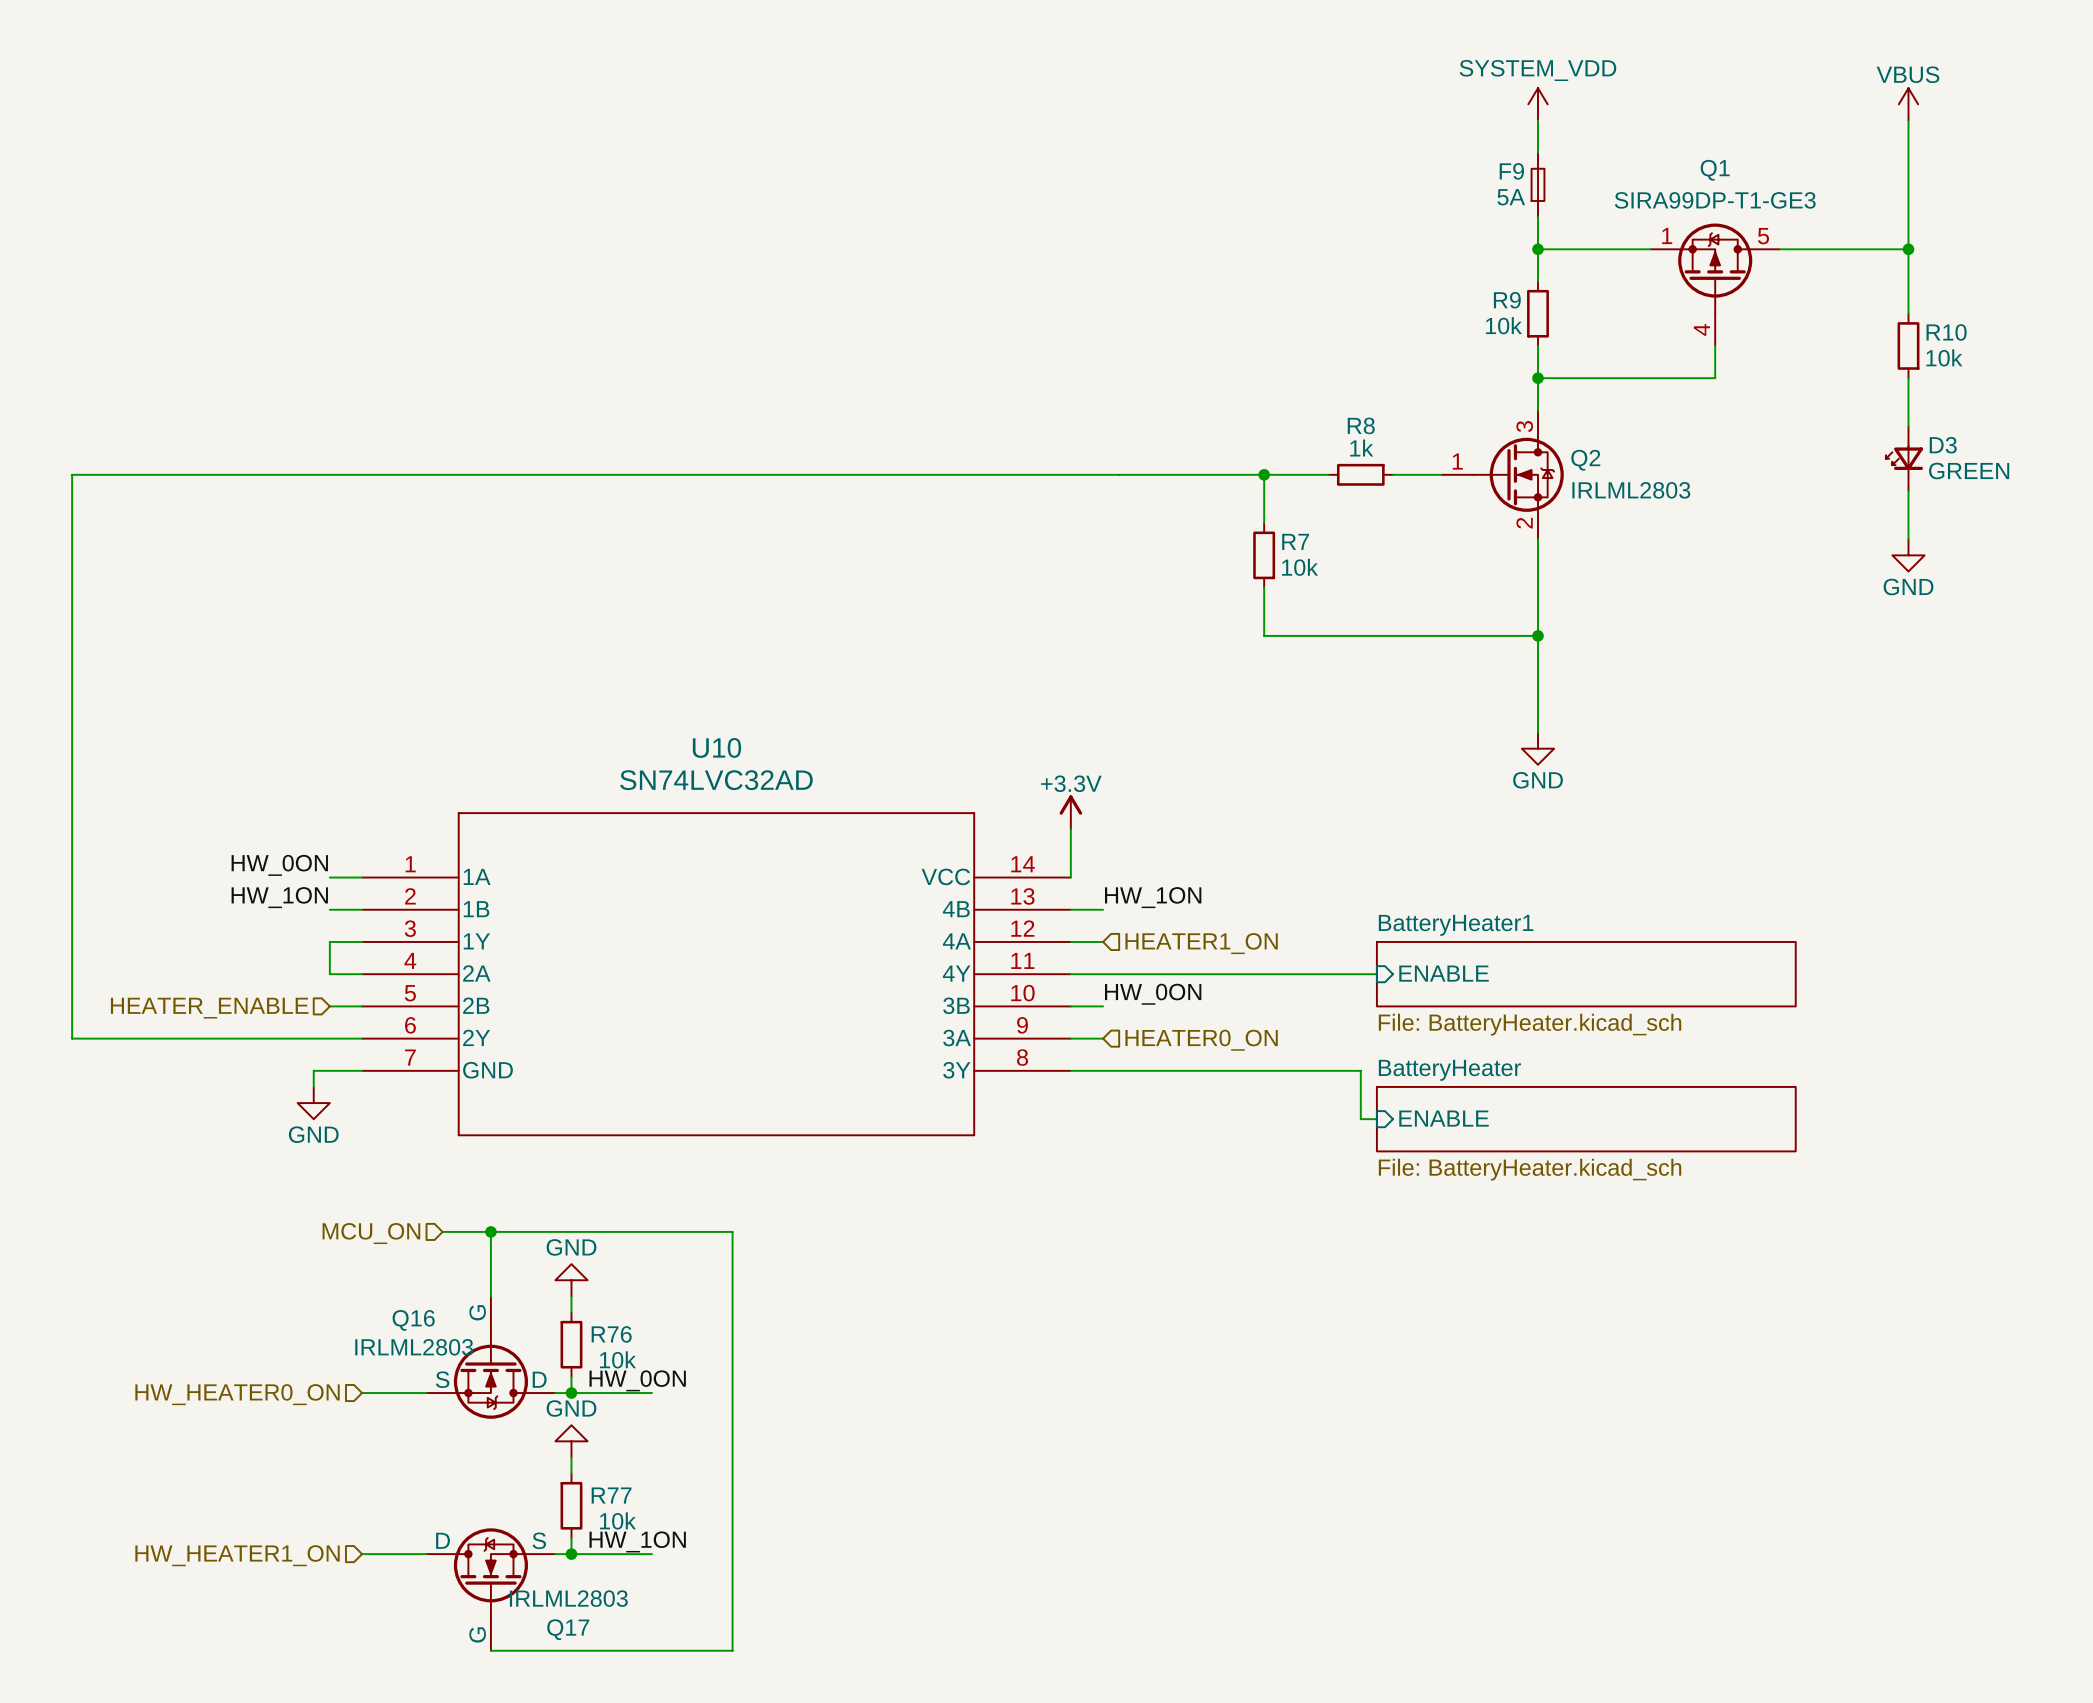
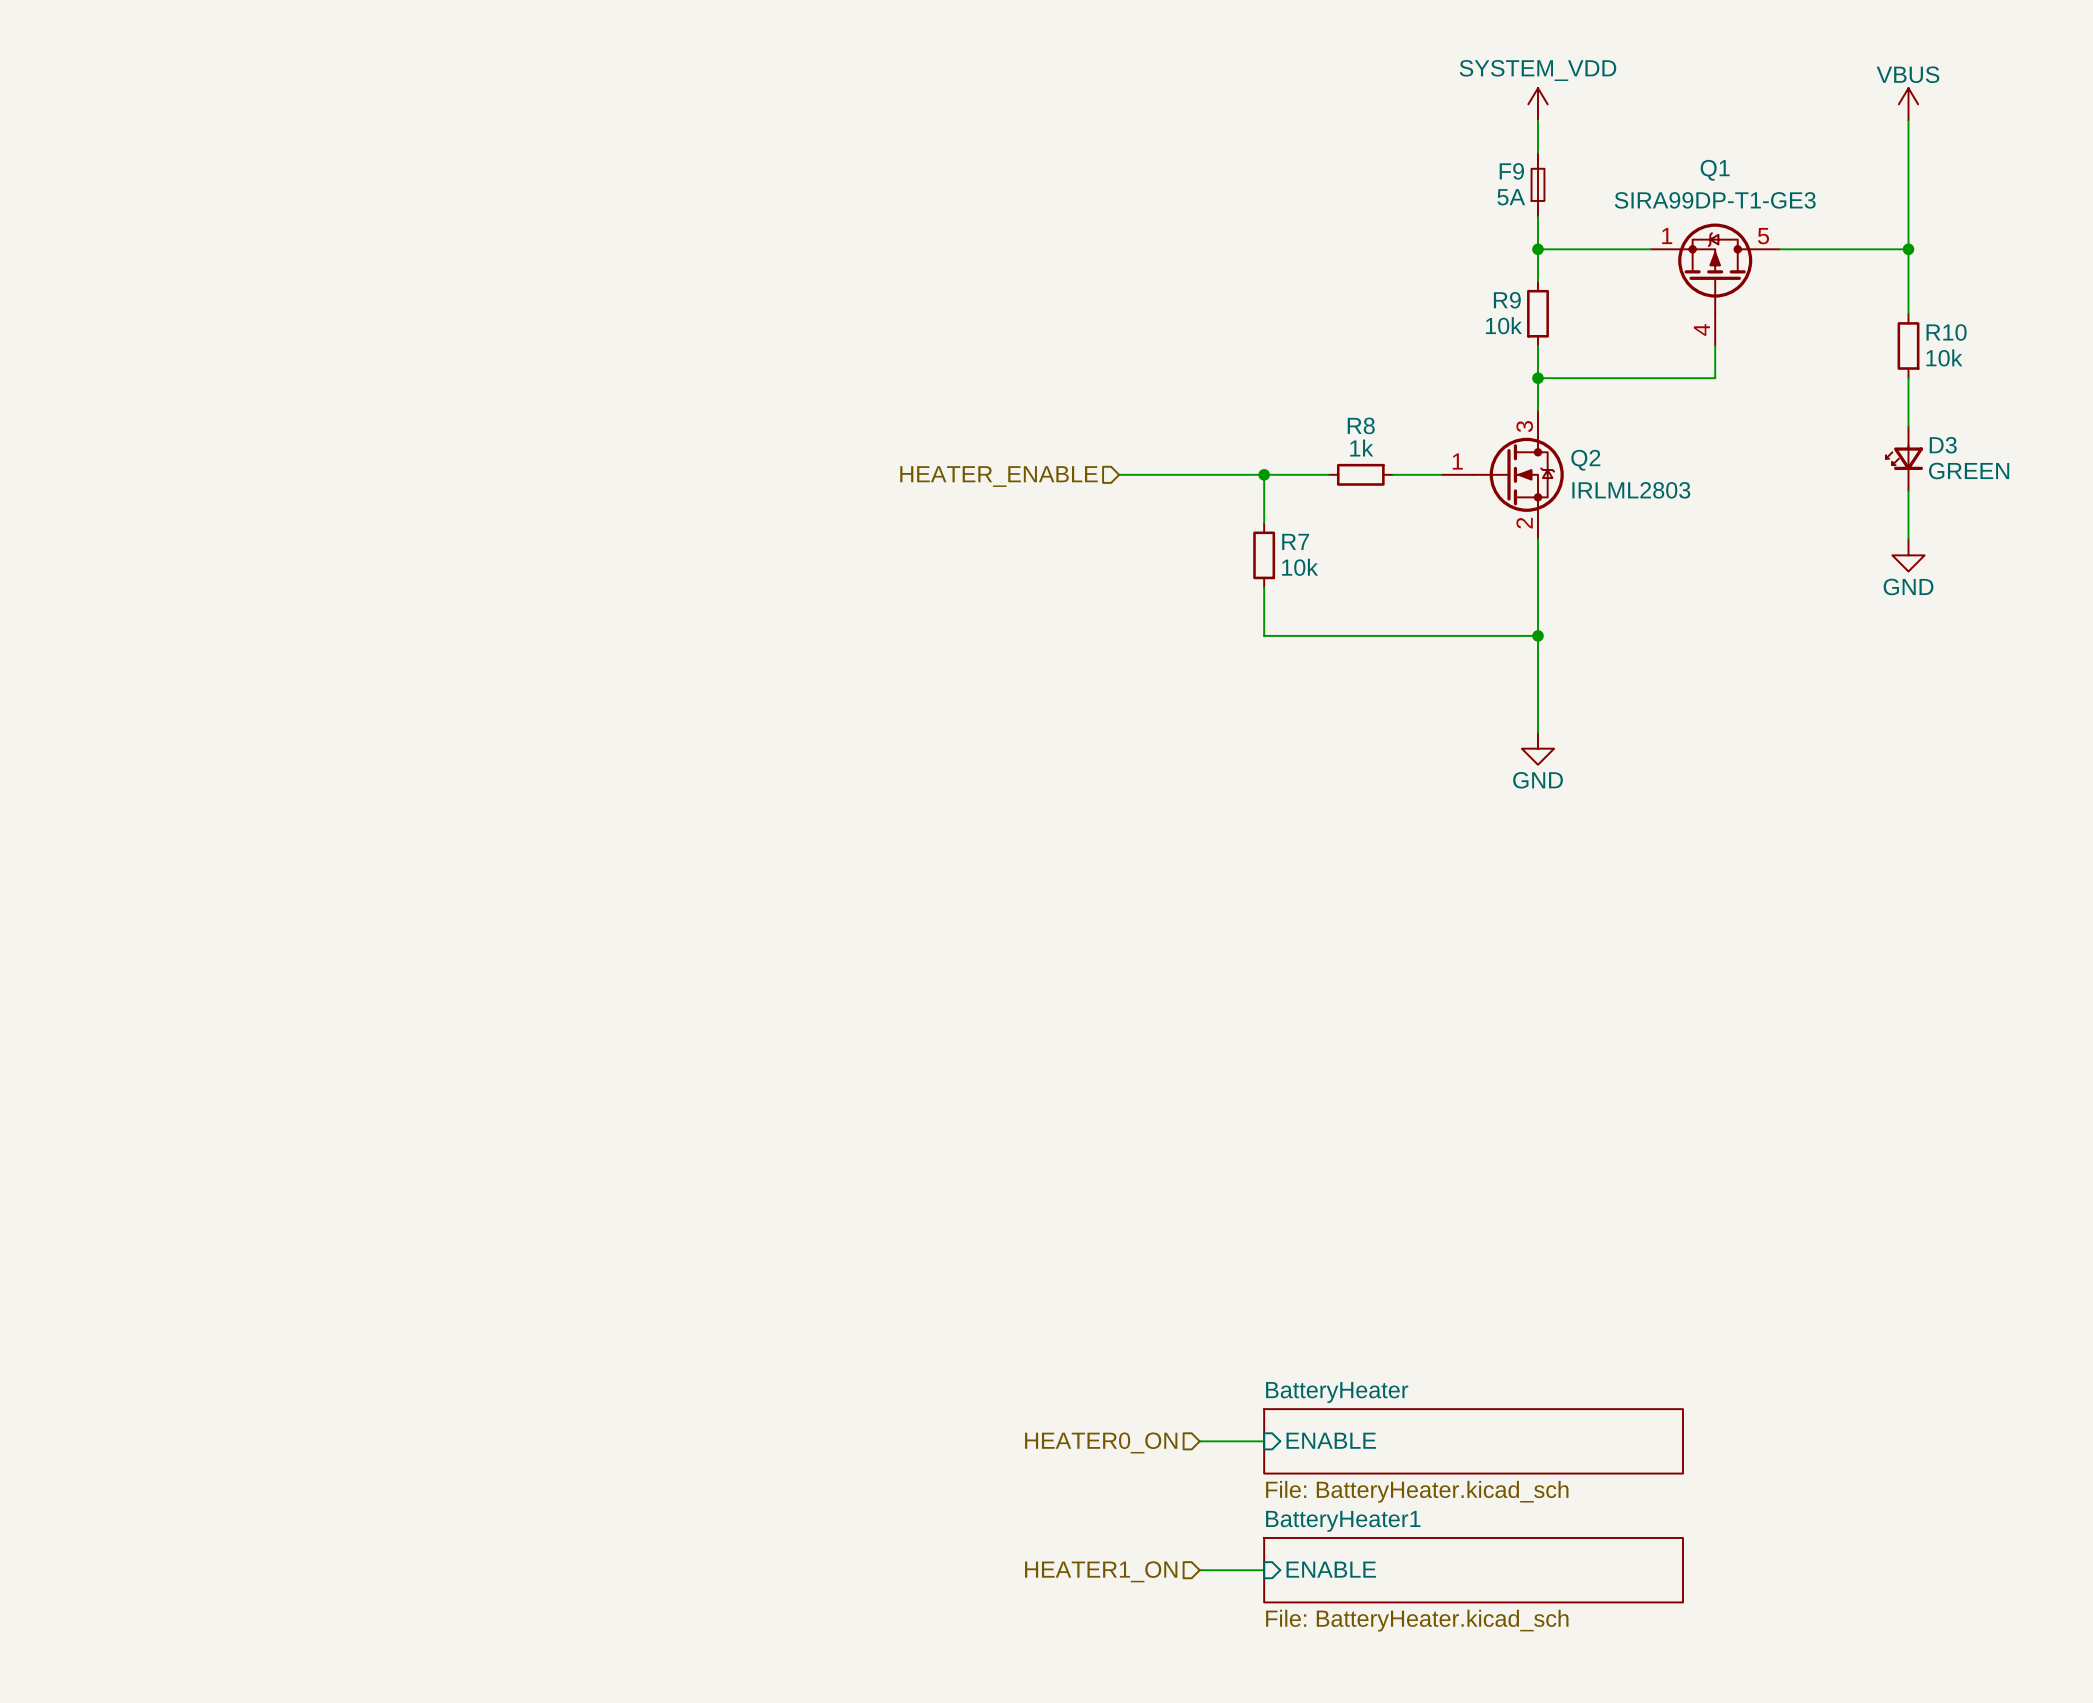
wire: (1119, 474) (72, 474) (72, 1038) (362, 1038) -> none
hierarchical label: none -> HEATER_ENABLE (998, 476)
power symbol: +3.3V (1070, 812) -> none
wire: (1070, 829) (1070, 877) -> none
label: HW_0ON (279, 865) -> none
wire: (329, 877) (362, 877) -> none
label: HW_1ON (279, 897) -> none
label: HW_1ON (1153, 897) -> none
wire: (329, 909) (362, 909) -> none
wire: (1070, 909) (1103, 909) -> none
wire: (362, 941) (329, 941) (329, 974) (362, 974) -> none
wire: (1070, 941) (1103, 941) -> none
hierarchical label: HEATER1_ON (1201, 943) -> none
sheet pin: ENABLE (1444, 973) -> none
U10: SN74LVC32AD (716, 974) -> none
wire: (1070, 974) (1376, 974) -> none
sheet BatteryHeater1 position: (1586, 974) -> (1473, 1570)
label: HW_0ON (1153, 994) -> none
wire: (329, 1006) (362, 1006) -> none
wire: (1070, 1006) (1103, 1006) -> none
hierarchical label: HEATER_ENABLE (209, 1008) -> none
wire: (1070, 1038) (1103, 1038) -> none
hierarchical label: HEATER0_ON (1201, 1040) -> none
wire: (362, 1070) (313, 1070) (313, 1086) -> none
wire: (1070, 1070) (1360, 1070) (1360, 1119) (1376, 1119) -> none
power symbol: GND (313, 1103) -> none
sheet pin: ENABLE (1444, 1118) -> none
sheet BatteryHeater: File: BatteryHeater.kicad_sch (1586, 1119) -> none
wire: (442, 1231) (732, 1231) (732, 1650) (490, 1650) -> none
wire: (490, 1231) (490, 1296) -> none
junction: (490, 1231) -> none
hierarchical label: MCU_ON (371, 1233) -> none
power symbol: GND (571, 1280) -> none
wire: (571, 1296) (571, 1312) -> none
R76: 10k (571, 1344) -> none
Q16: IRLML2803 (490, 1357) -> none
wire: (571, 1376) (571, 1393) -> none
label: HW_0ON (637, 1380) -> none
wire: (362, 1393) (426, 1393) -> none
wire: (555, 1393) (652, 1393) -> none
junction: (571, 1393) -> none
hierarchical label: HW_HEATER0_ON (237, 1394) -> none
sheet pin: none -> ENABLE (1331, 1440)
power symbol: GND (571, 1441) -> none
wire: none -> (1199, 1441) (1264, 1441)
sheet BatteryHeater: none -> File: BatteryHeater.kicad_sch (1473, 1441)
hierarchical label: none -> HEATER0_ON (1101, 1442)
wire: (571, 1457) (571, 1473) -> none
R77: 10k (571, 1505) -> none
wire: (571, 1537) (571, 1554) -> none
label: HW_1ON (637, 1541) -> none
wire: (362, 1554) (426, 1554) -> none
wire: (555, 1554) (652, 1554) -> none
junction: (571, 1554) -> none
hierarchical label: HW_HEATER1_ON (237, 1555) -> none
sheet pin: none -> ENABLE (1331, 1569)
wire: none -> (1199, 1570) (1264, 1570)
hierarchical label: none -> HEATER1_ON (1101, 1571)
Q17: IRLML2803 (490, 1589) -> none

